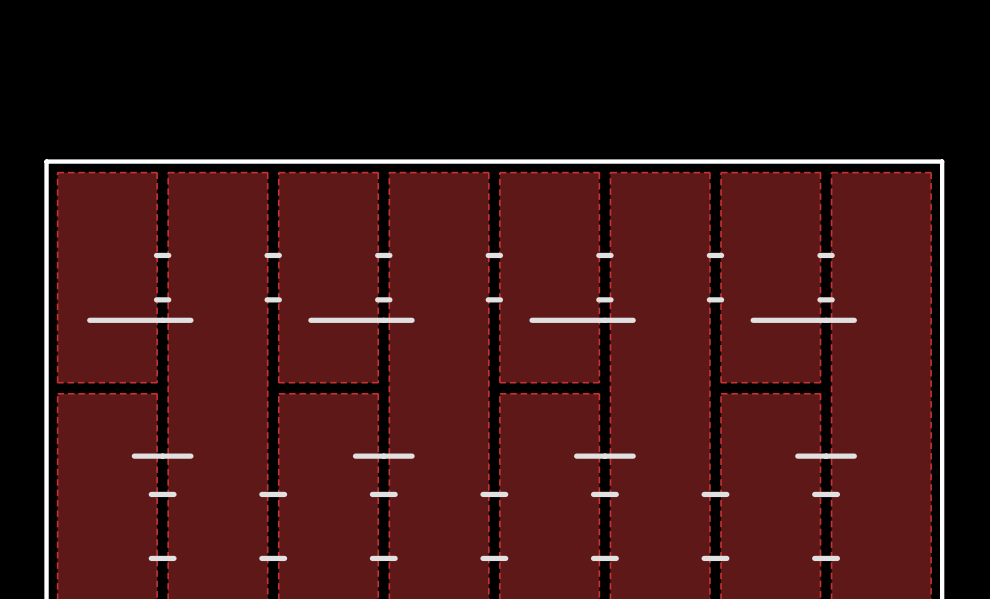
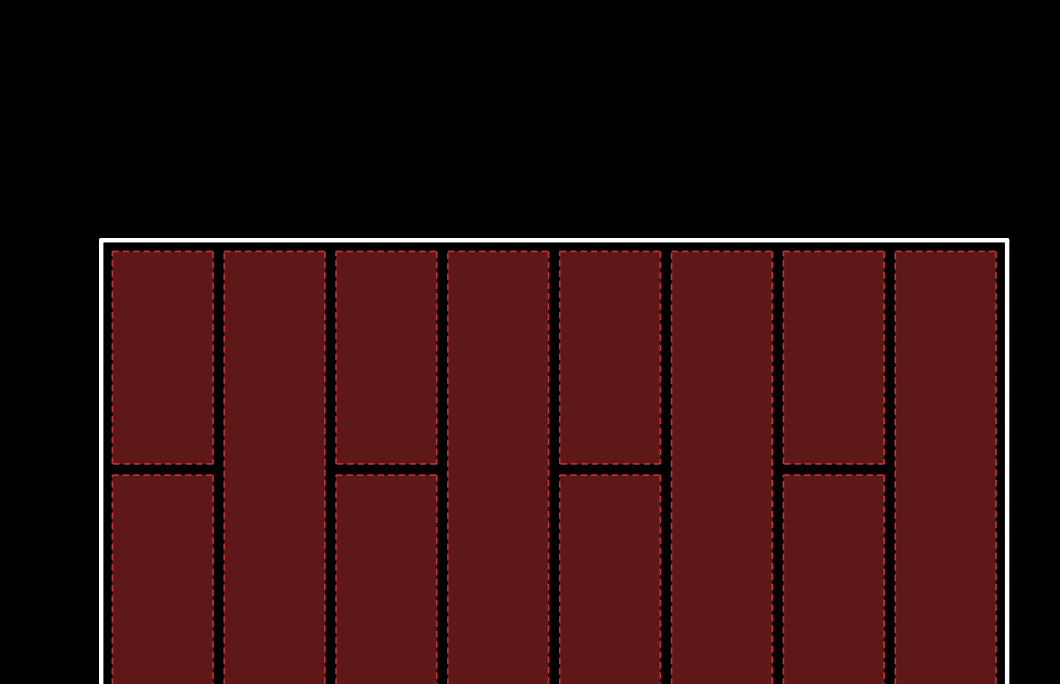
drawing: [87, 252, 194, 562] -> none
drawing: [259, 252, 415, 562] -> none
drawing: [480, 252, 636, 562] -> none
drawing: [701, 252, 857, 562] -> none

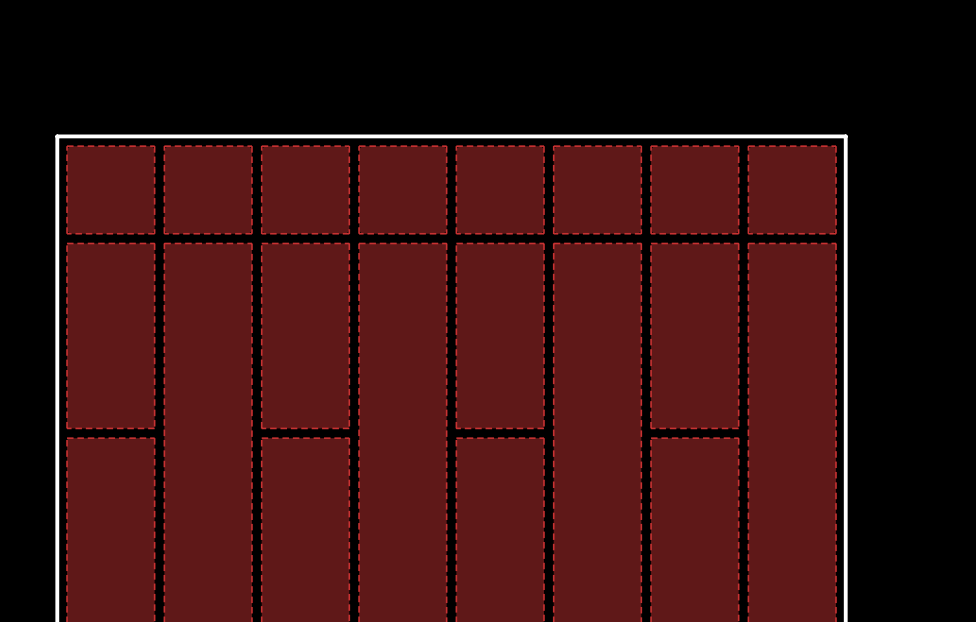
top zone outline: none -> (67, 146) (154, 146) (154, 233) (67, 233) (67, 146)
top zone outline: none -> (164, 146) (251, 146) (251, 233) (164, 233) (164, 146)
top zone outline: none -> (261, 146) (349, 146) (349, 233) (261, 233) (261, 146)
top zone outline: none -> (359, 146) (446, 146) (446, 233) (359, 233) (359, 146)
top zone outline: none -> (456, 146) (456, 233) (543, 233) (543, 146) (456, 146)
top zone outline: none -> (553, 146) (553, 233) (641, 233) (641, 146) (553, 146)
top zone outline: none -> (651, 146) (651, 233) (738, 233) (738, 146) (651, 146)
top zone outline: none -> (748, 146) (835, 146) (835, 233) (748, 233) (748, 146)
board edge: (101, 240) (1007, 240) -> (57, 233) (57, 136) (845, 136) (845, 233)

